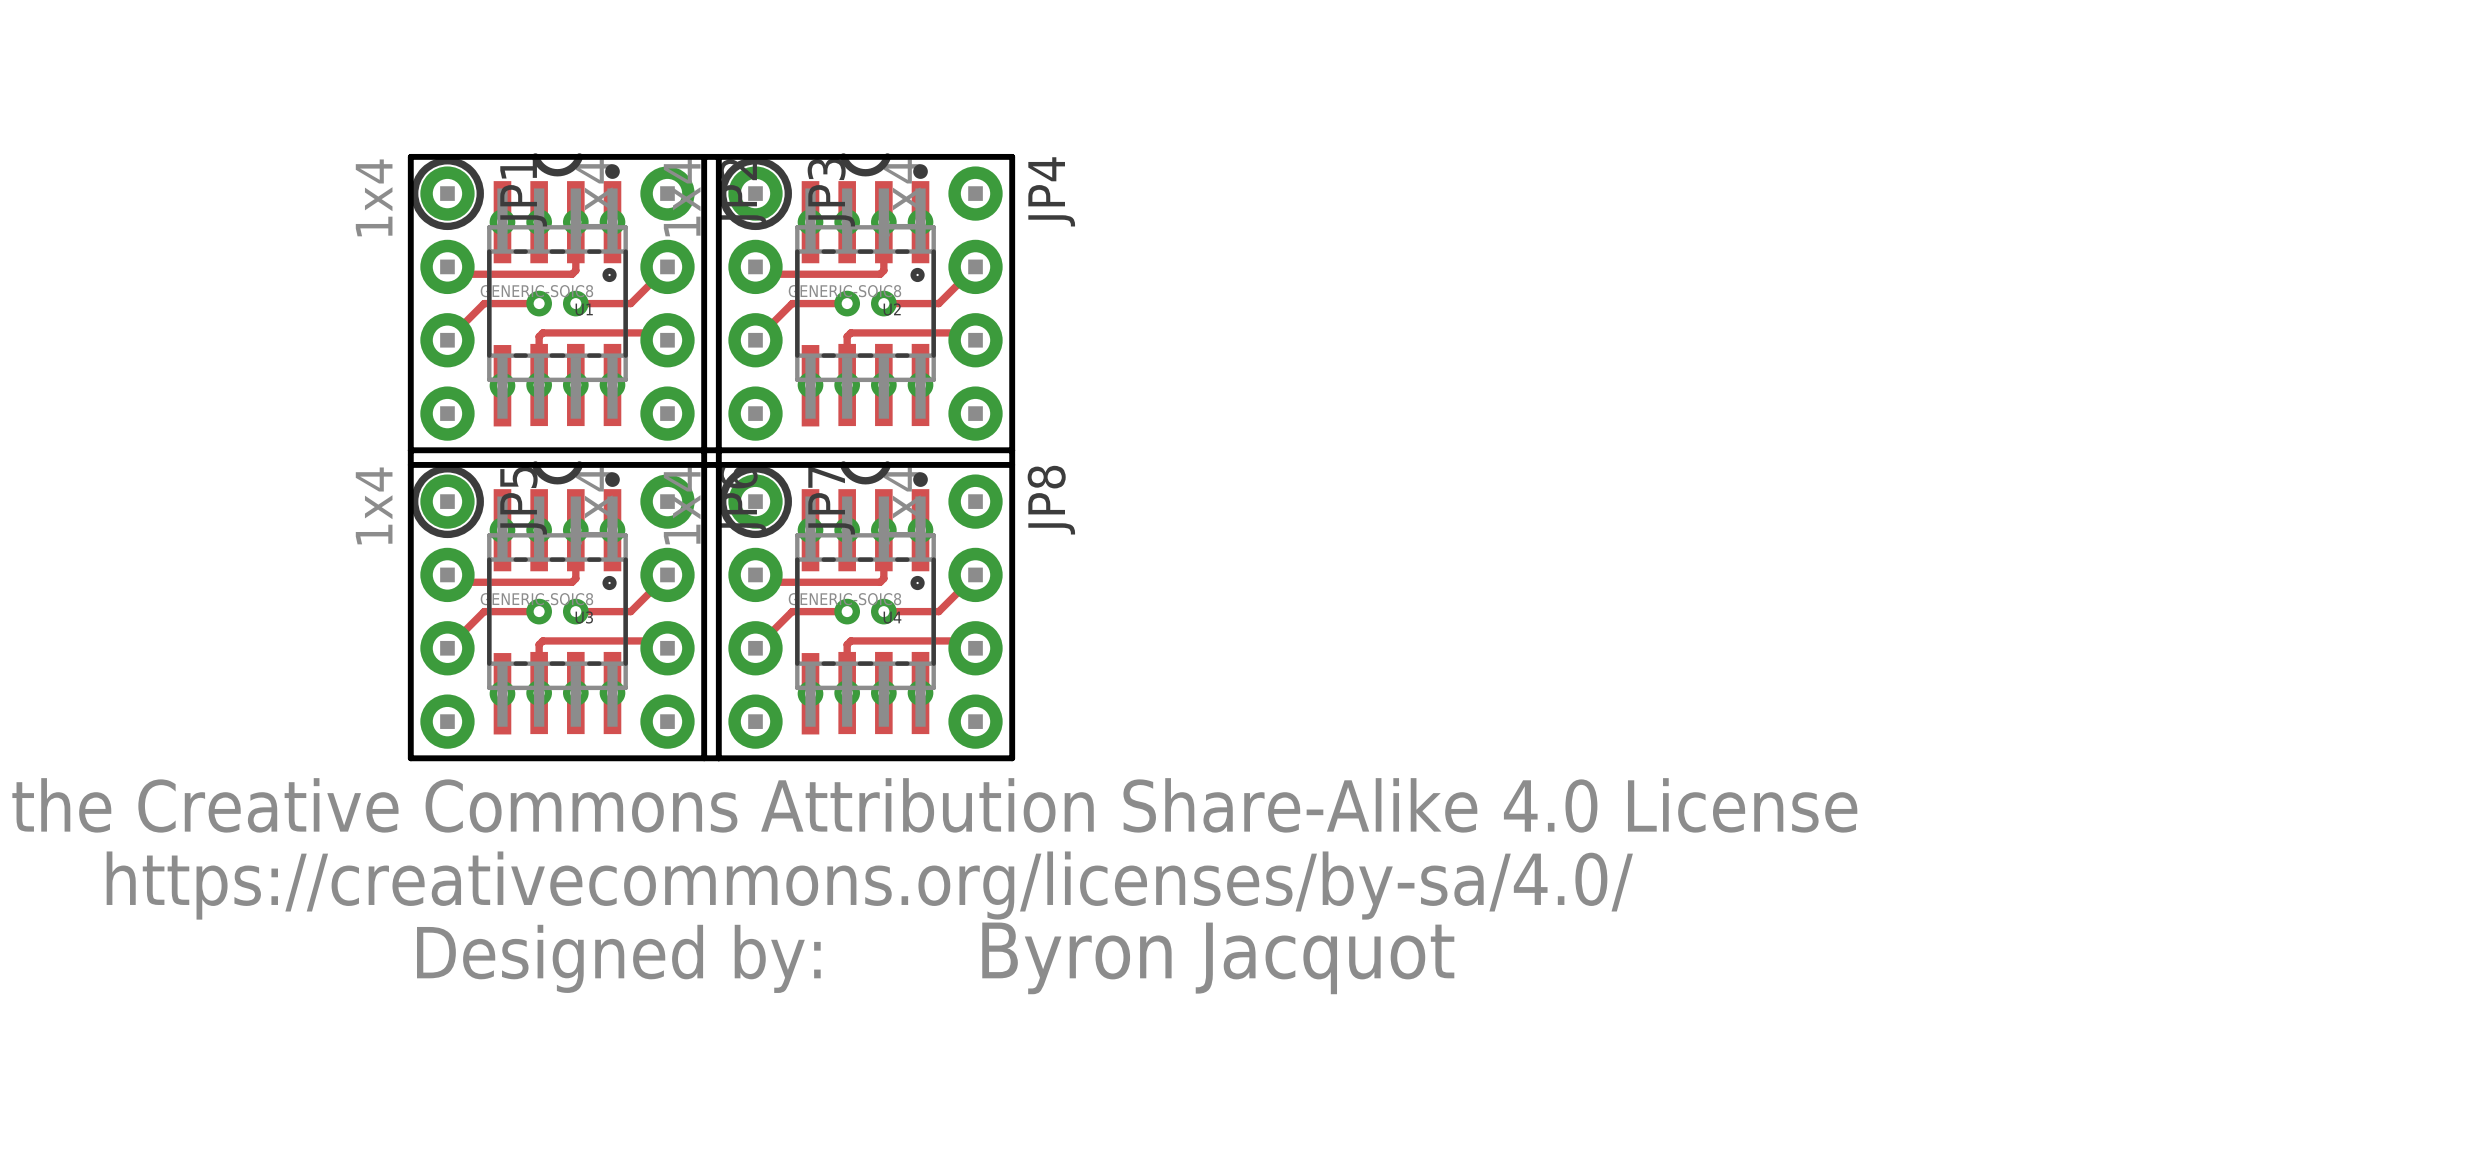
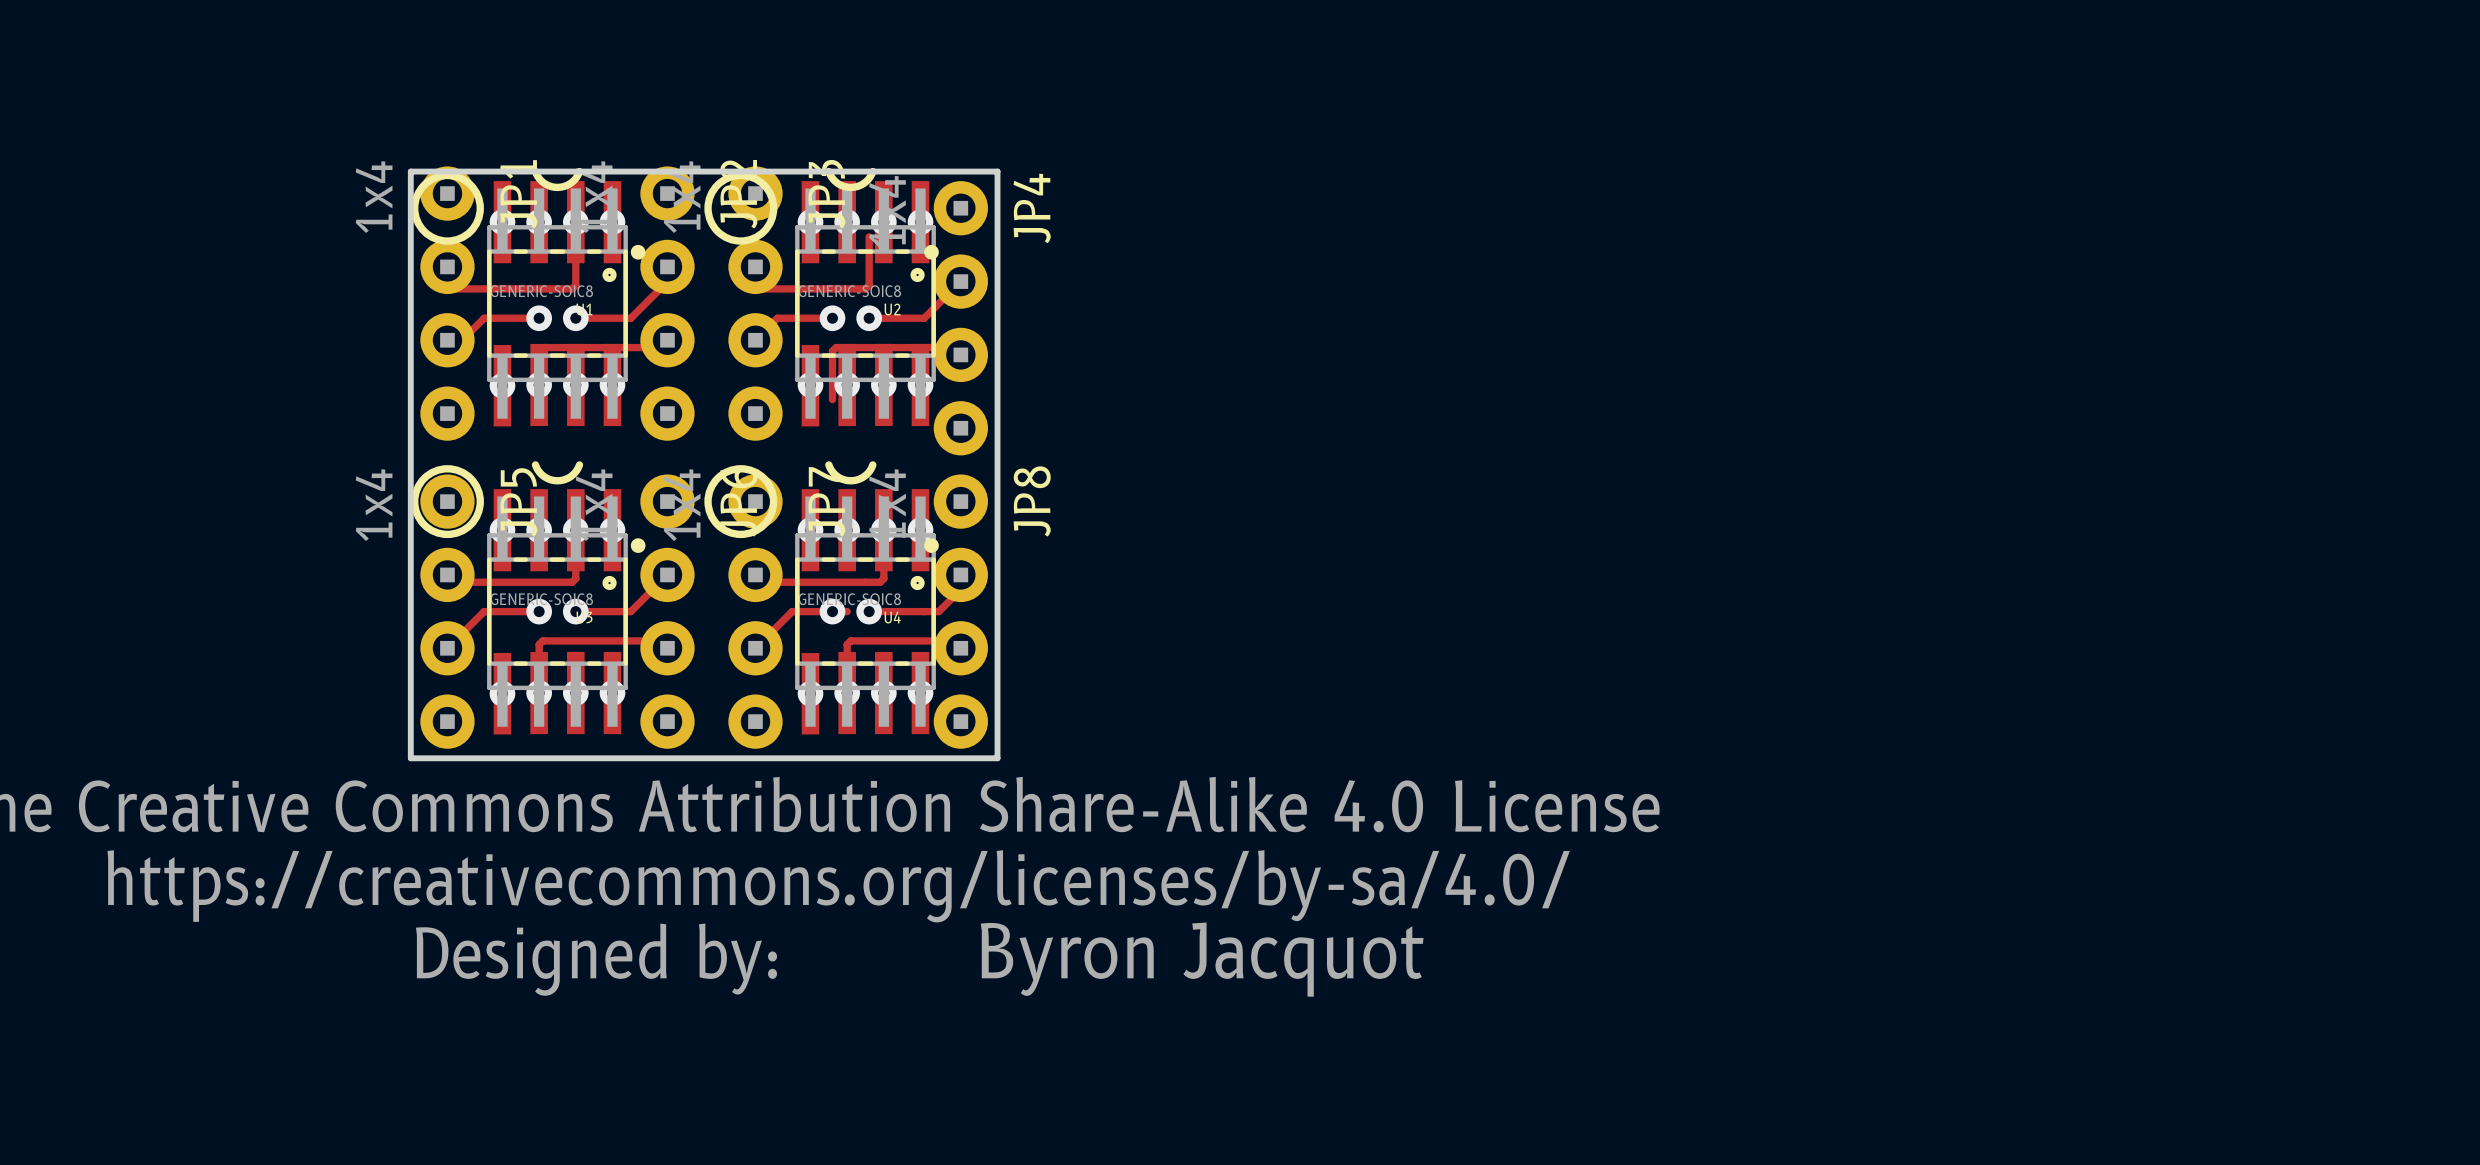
line: (535, 156) (543, 168) (557, 172) (571, 168) (579, 156) -> (535, 171) (543, 183) (557, 187) (571, 183) (579, 171)
board edge: (704, 156) (704, 758) -> none
board edge: (718, 156) (718, 758) -> none
line: (843, 156) (851, 168) (865, 172) (879, 168) (887, 156) -> (828, 171) (837, 183) (850, 187) (864, 183) (872, 171)
board edge: (410, 171) (410, 156) (1012, 156) (1012, 758) (997, 758) -> (410, 171) (997, 171) (997, 758)
drawing position: (612, 171) -> (638, 252)
drawing position: (920, 171) -> (931, 252)
drawing position: (447, 193) -> (447, 208)
drawing position: (755, 193) -> (740, 208)
track: (883, 222) (883, 270) (880, 274) (762, 274) (755, 266) -> (869, 236) (869, 285) (865, 288) (748, 288) (740, 281)
track: (447, 266) (454, 274) (572, 274) (575, 270) -> (447, 281) (454, 288) (572, 288) (575, 285) (575, 270)
track: (667, 266) (630, 303) (575, 303) -> (667, 281) (630, 318) (575, 318)
track: (539, 303) (484, 303) (447, 340) -> (539, 318) (484, 318) (447, 354)
via position: (539, 303) -> (539, 318)
via position: (575, 303) -> (575, 318)
track: (847, 303) (792, 303) (777, 318) -> (832, 318) (777, 318)
via: (847, 303) -> none
track: (883, 303) (938, 303) -> (869, 318) (924, 318) (938, 303)
via: (883, 303) -> none
JP4 position: (975, 303) -> (960, 318)
via: none -> (832, 318)
via: none -> (869, 318)
track: (667, 340) (660, 332) (542, 332) (539, 336) (539, 351) -> (667, 354) (660, 347) (542, 347) (539, 351)
track: (975, 340) (968, 332) (850, 332) (847, 336) (847, 384) -> (960, 354) (953, 347) (836, 347) (832, 351) (832, 399)
board edge: (410, 450) (1012, 450) -> none
board edge: (410, 464) (1012, 464) -> none
line: (843, 464) (851, 476) (865, 480) (879, 476) (887, 464) -> (828, 464) (837, 476) (850, 480) (864, 476) (872, 464)
drawing position: (612, 479) -> (638, 545)
drawing position: (920, 479) -> (931, 545)
drawing position: (755, 501) -> (740, 501)
via: none -> (832, 611)
via: (847, 611) -> none
via: none -> (869, 611)
via: (883, 611) -> none
JP8 position: (975, 611) -> (960, 611)

